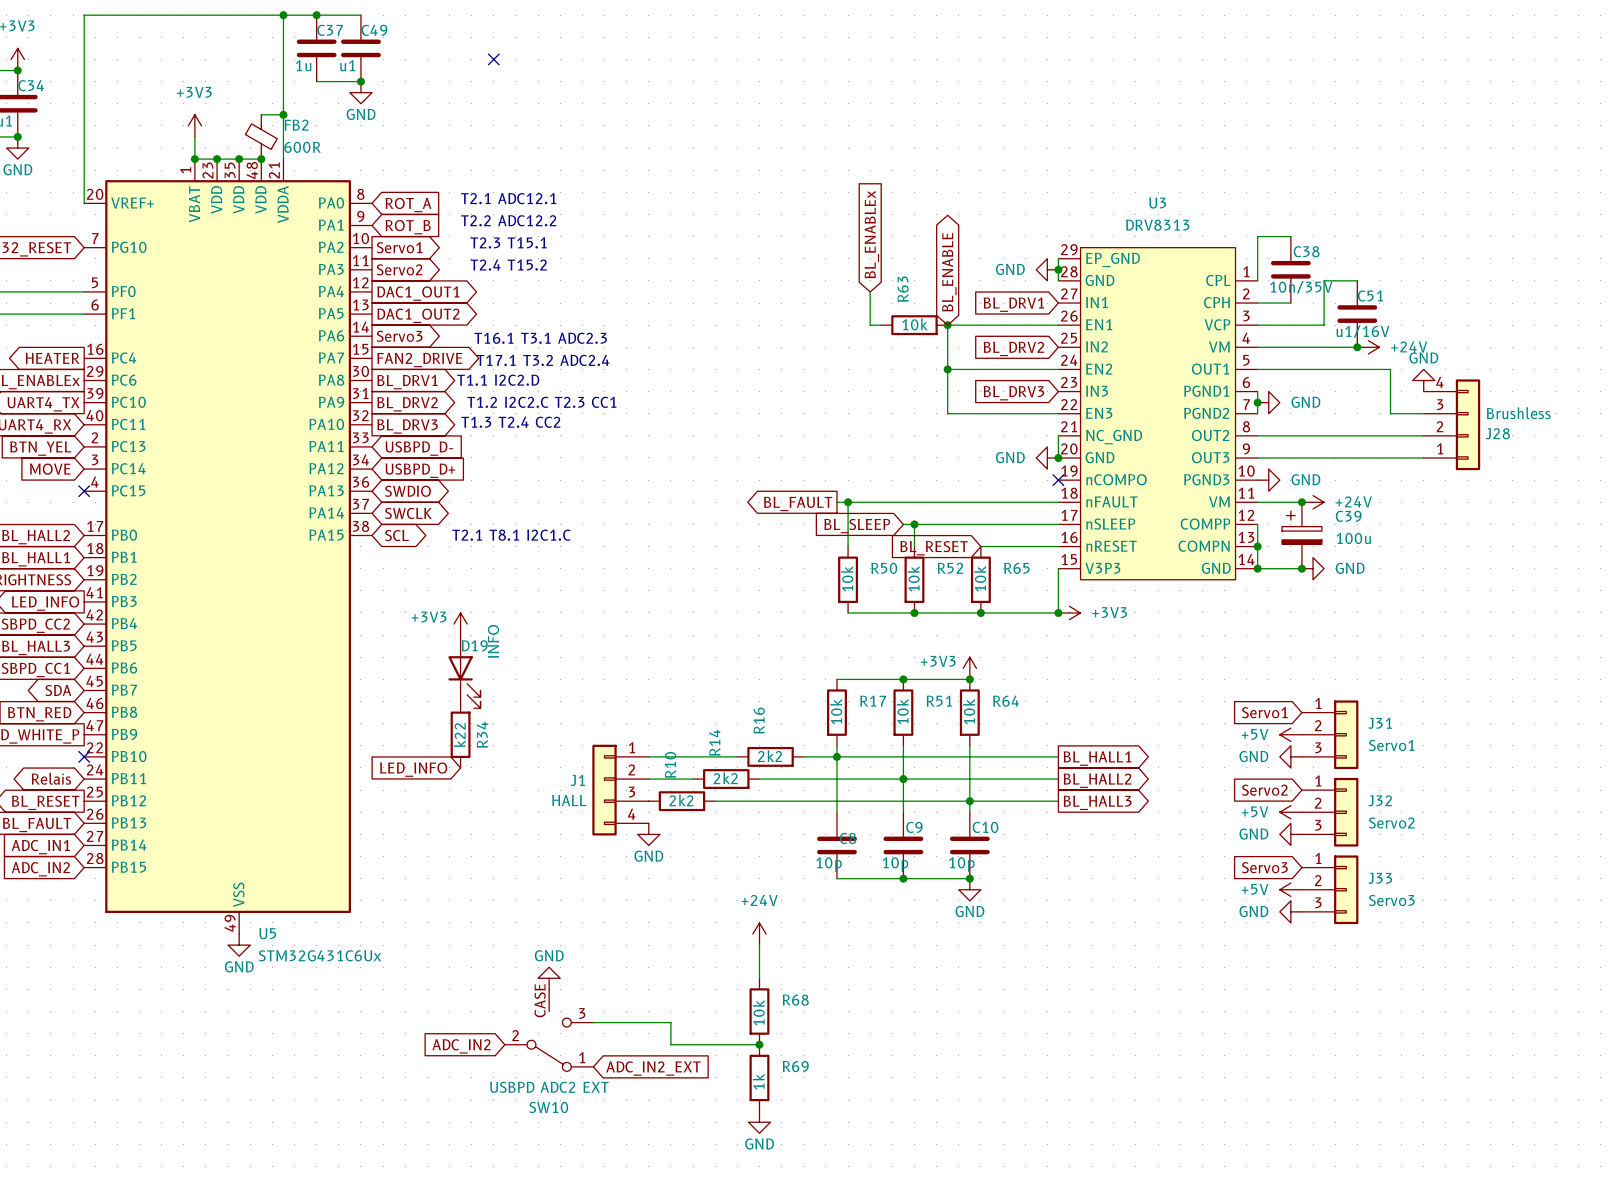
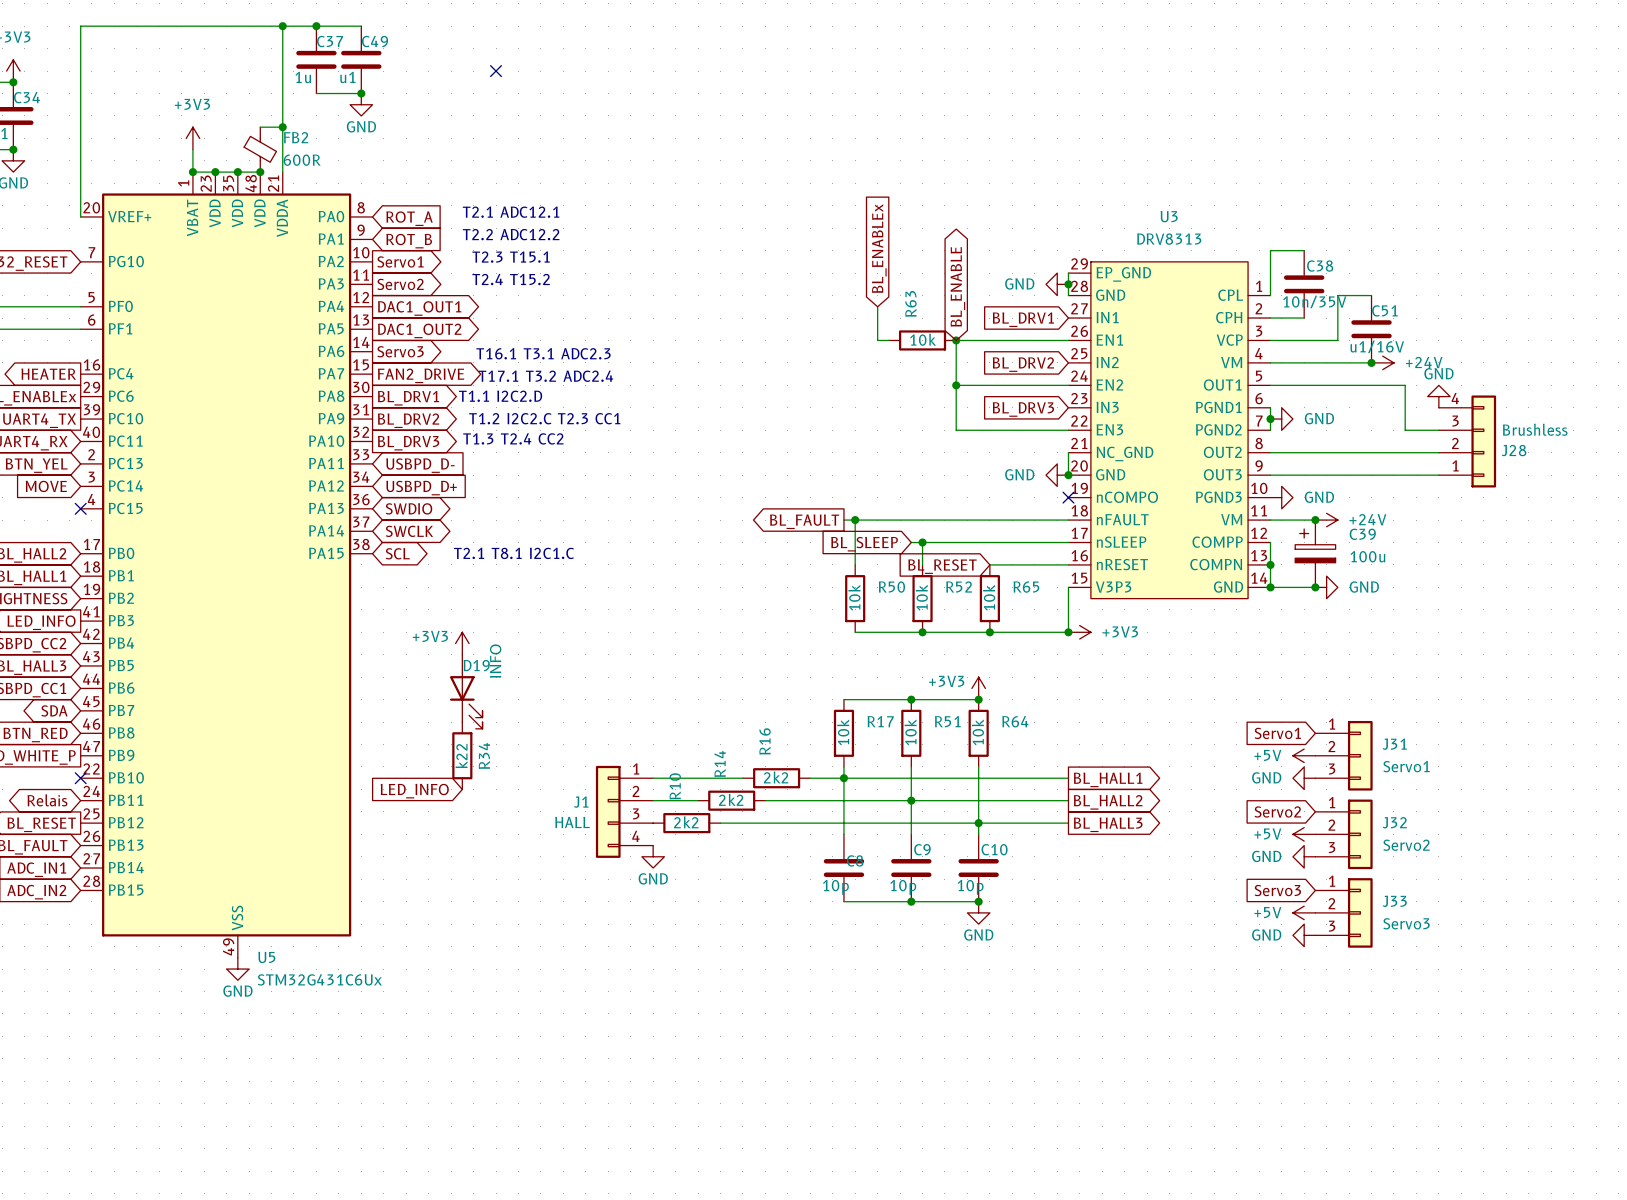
power symbol: +24V (759, 934) -> none
wire: (759, 945) (759, 978) -> none
power symbol: GND (549, 978) -> none
R68: 10k (759, 1011) -> none
wire: (593, 1022) (670, 1022) (670, 1044) (759, 1044) -> none
SW10: USBPD ADC2 EXT (549, 1030) -> none
junction: (759, 1044) -> none
global label: ADC_IN2 (461, 1046) -> none
global label: ADC_IN2_EXT (653, 1068) -> none
R69: 1k (759, 1077) -> none
power symbol: GND (759, 1122) -> none

